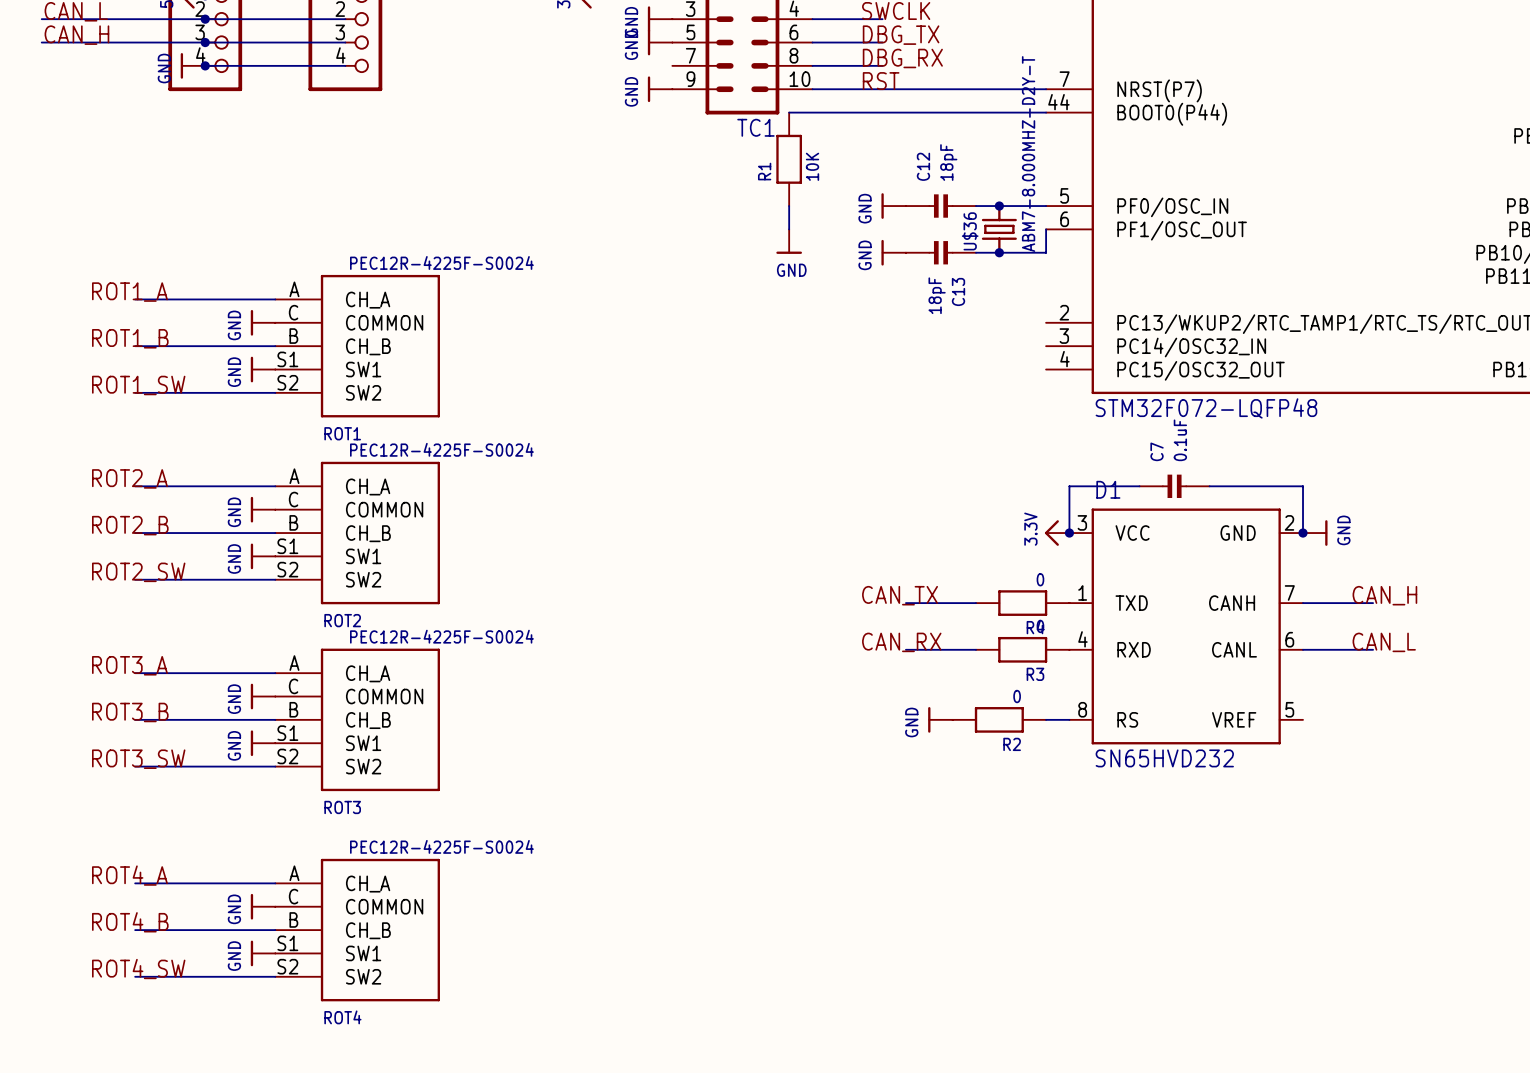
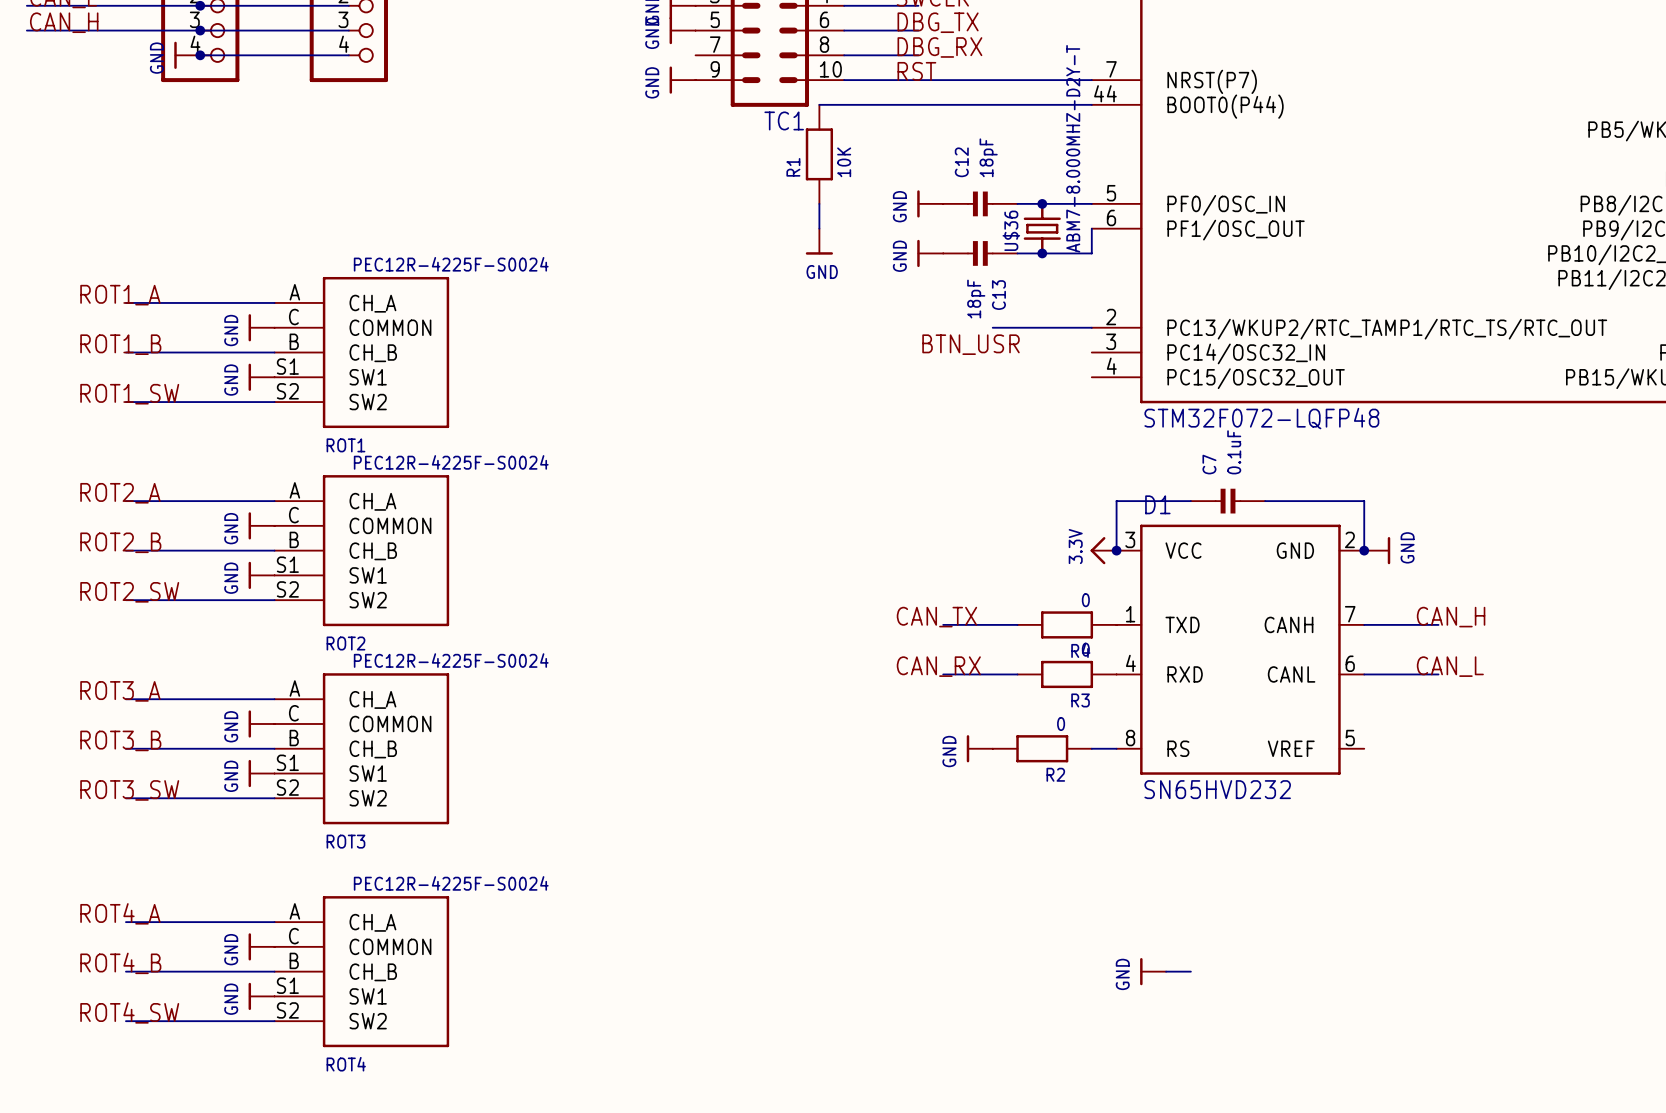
wire: none -> (992, 327) (1091, 327)
label: none -> BTN_USR (971, 344)
power symbol: none -> GND (1153, 971)
wire: none -> (1166, 971) (1190, 971)

